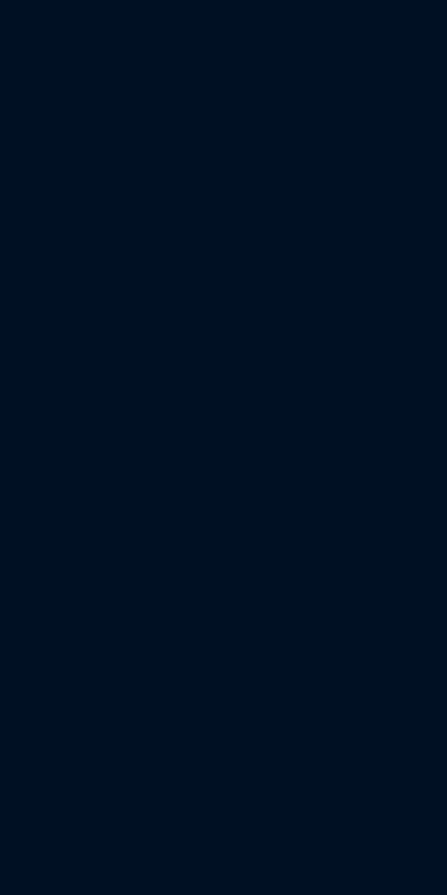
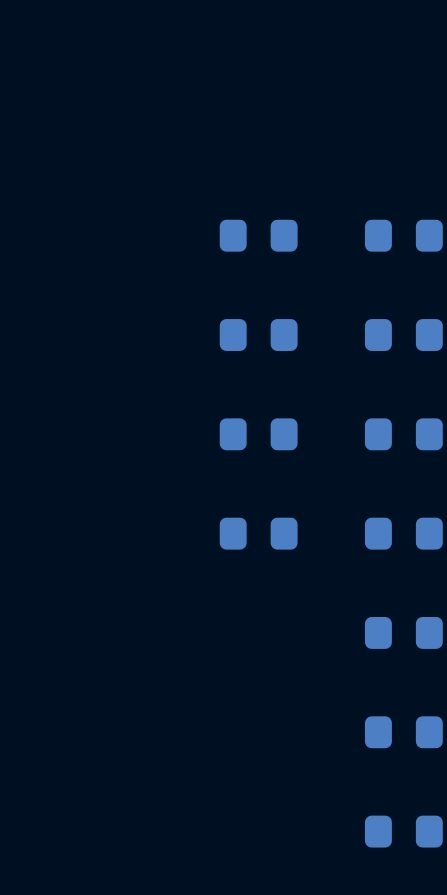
part: none -> (258, 235)
part: none -> (403, 235)
part: none -> (258, 335)
part: none -> (403, 335)
part: none -> (258, 434)
part: none -> (403, 434)
part: none -> (258, 533)
part: none -> (403, 533)
part: none -> (403, 632)
part: none -> (403, 732)
part: none -> (403, 831)

